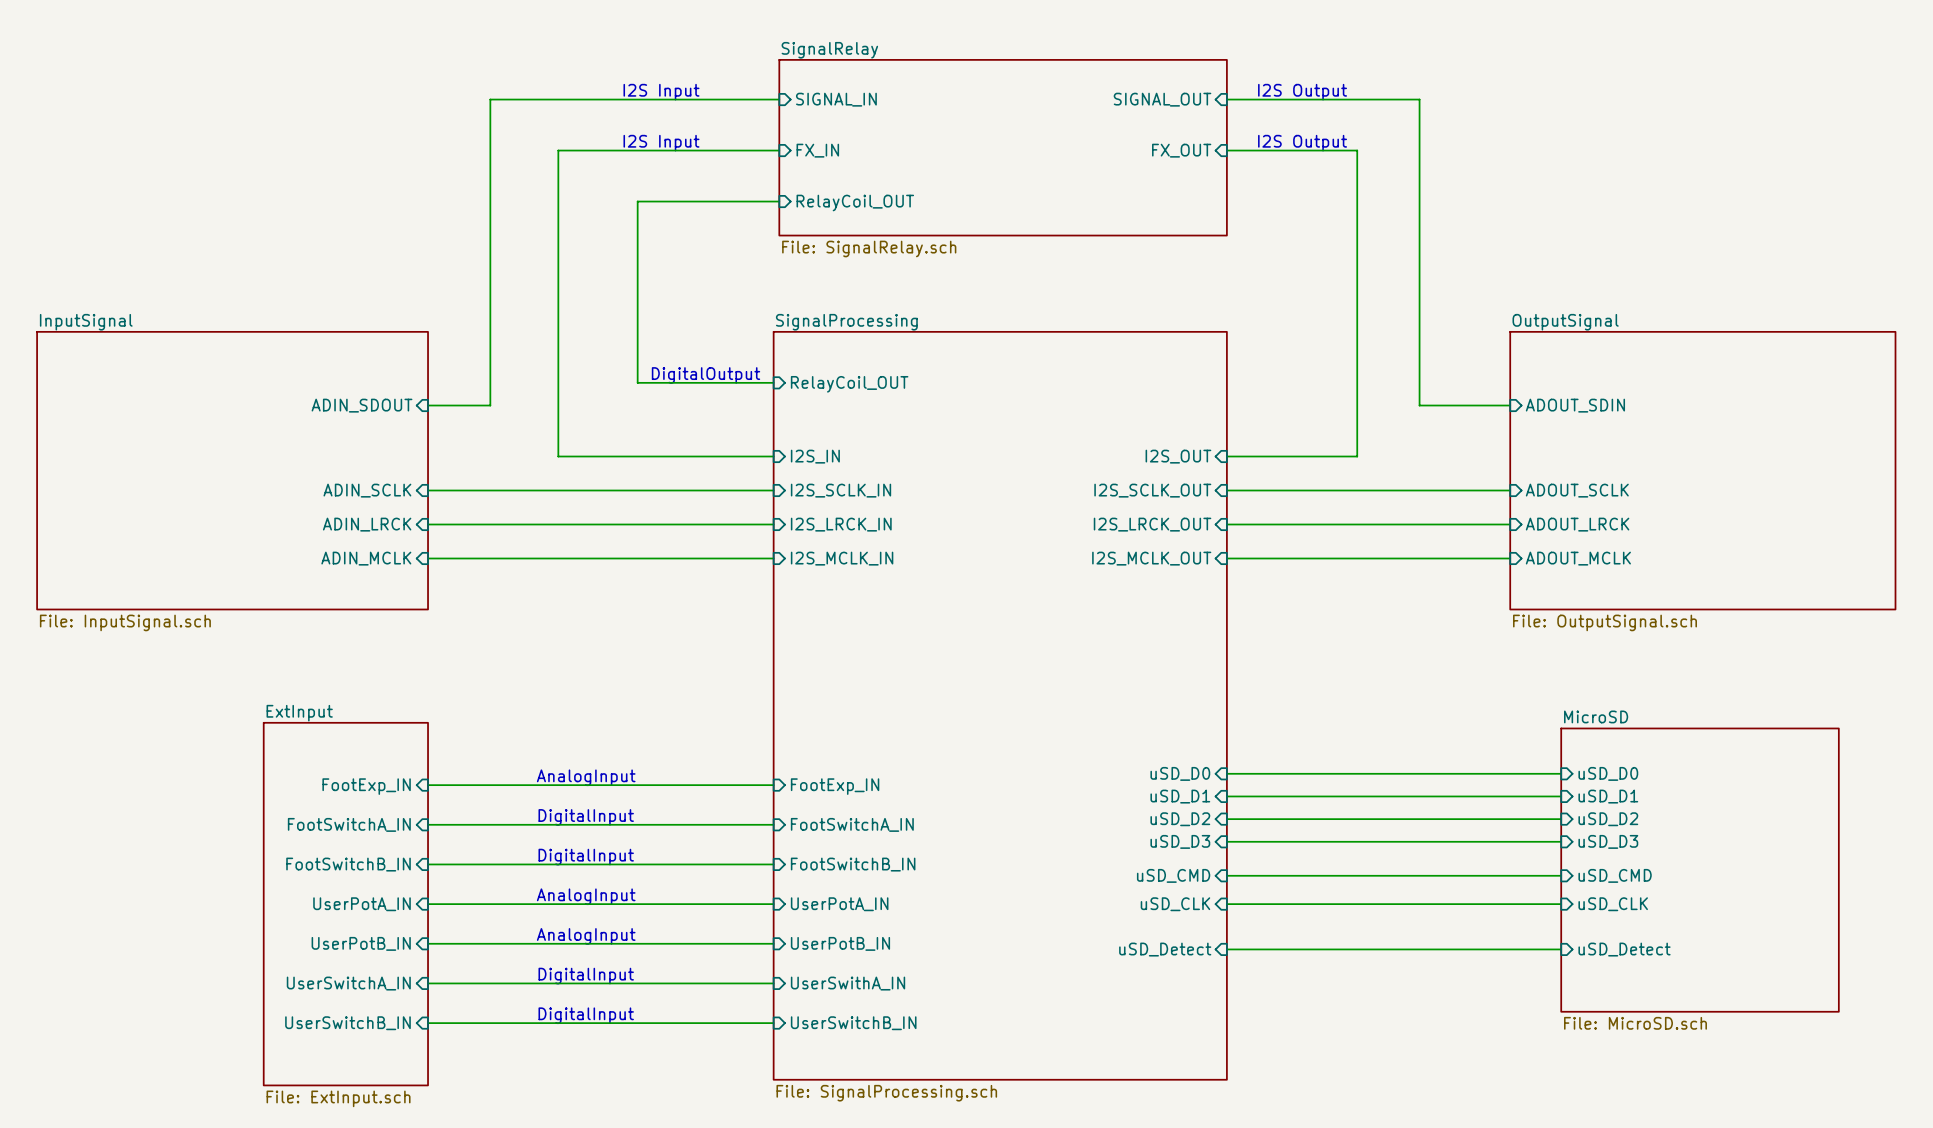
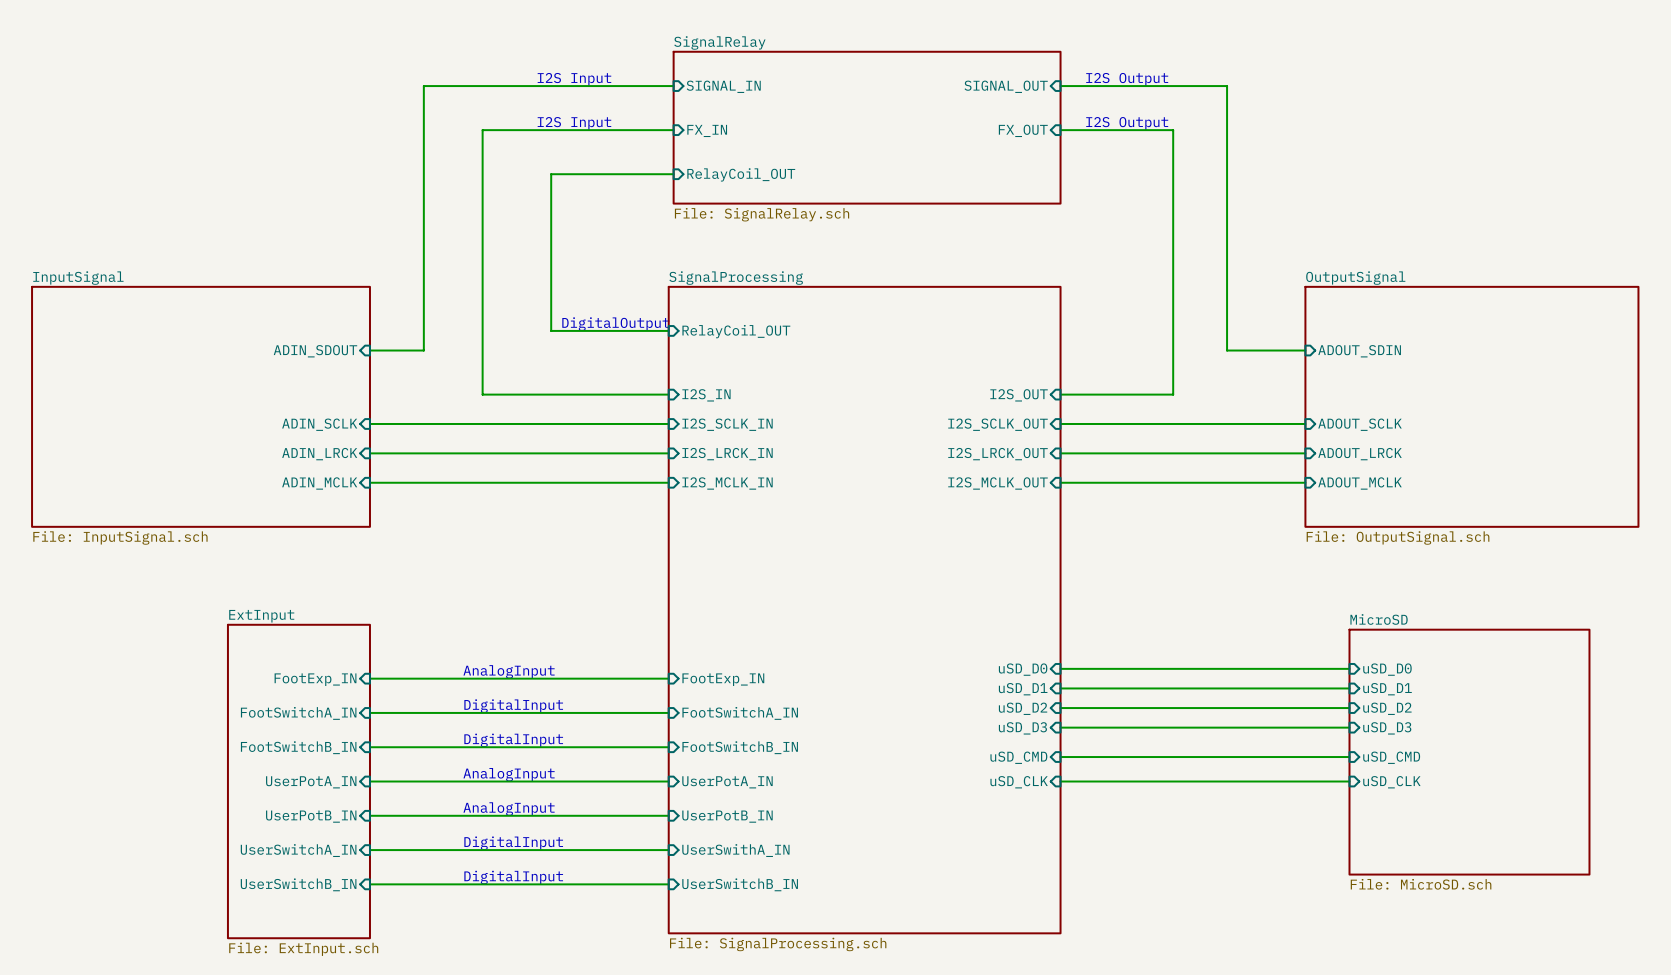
sheet pin: uSD_Detect (1165, 949) -> none
wire: (1226, 949) (1561, 949) -> none
sheet pin: uSD_Detect (1624, 949) -> none

